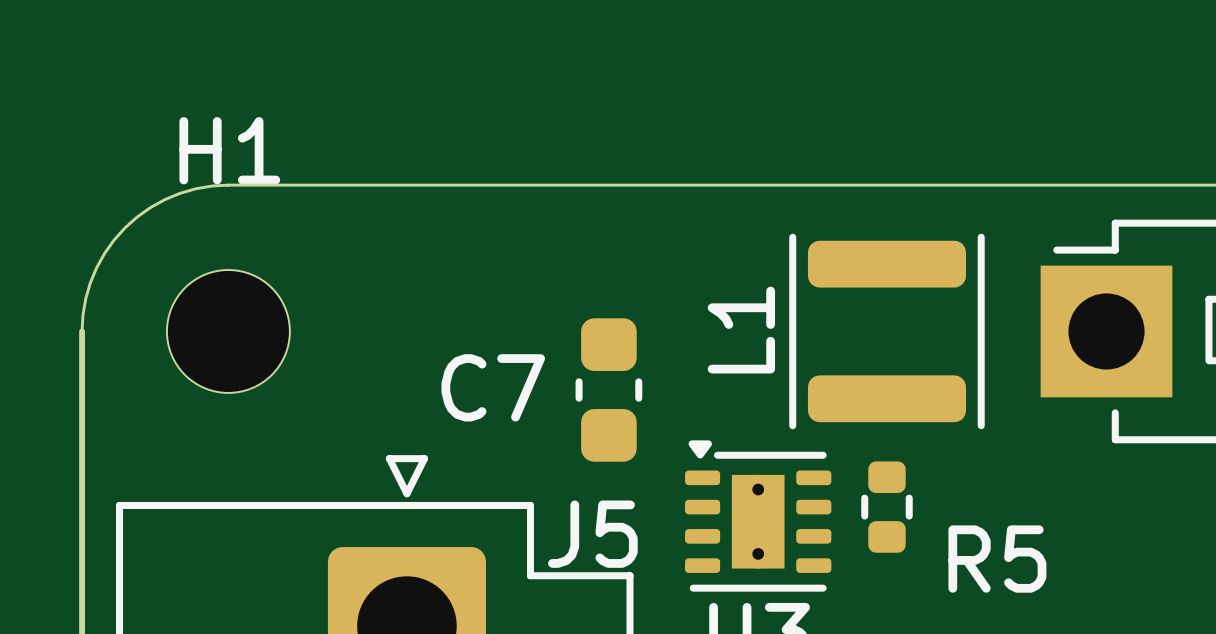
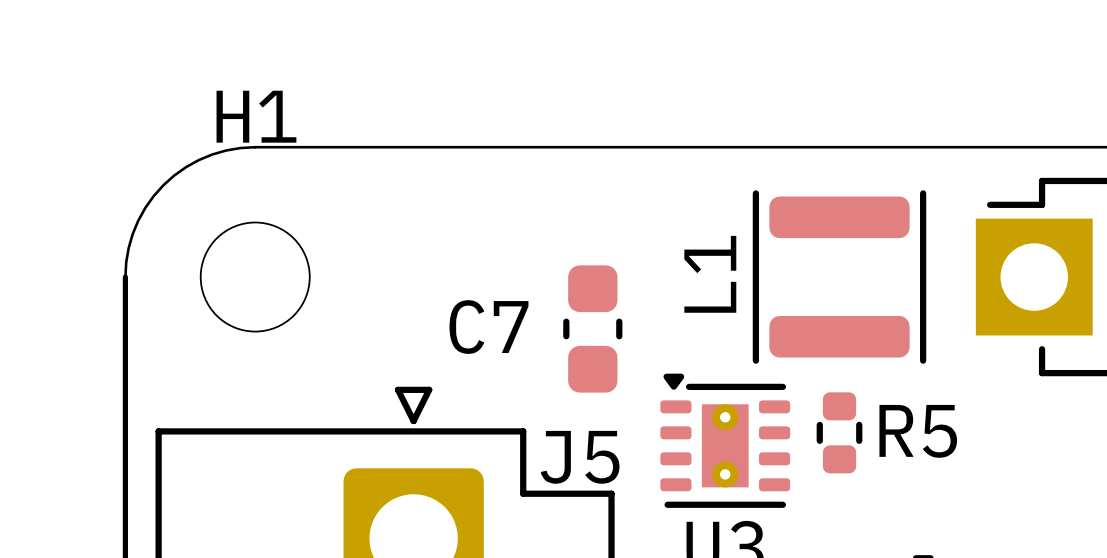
R5 name position: R5 (997, 559) -> R5 (918, 431)

